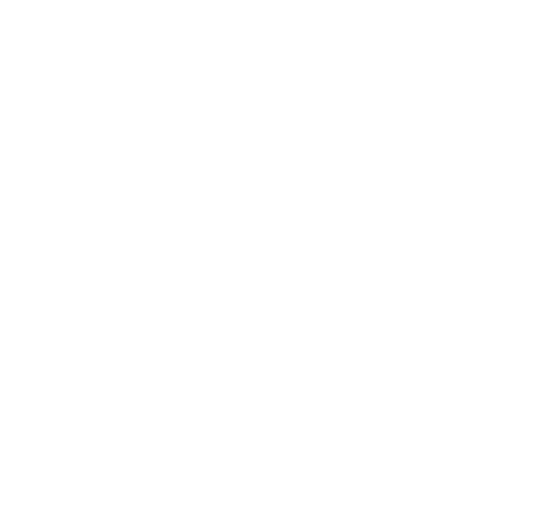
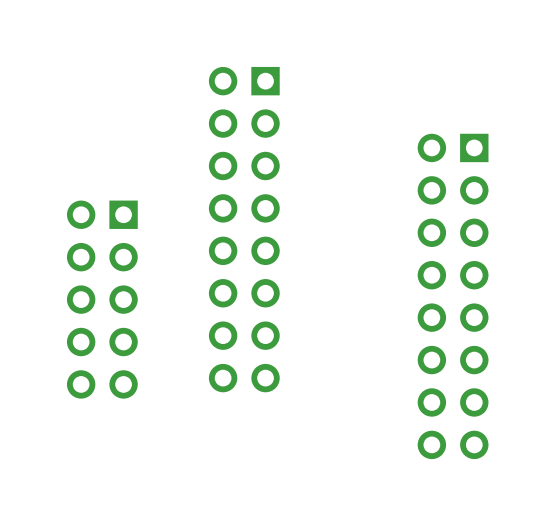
part: none -> (244, 229)
part: none -> (453, 296)
part: none -> (102, 299)

